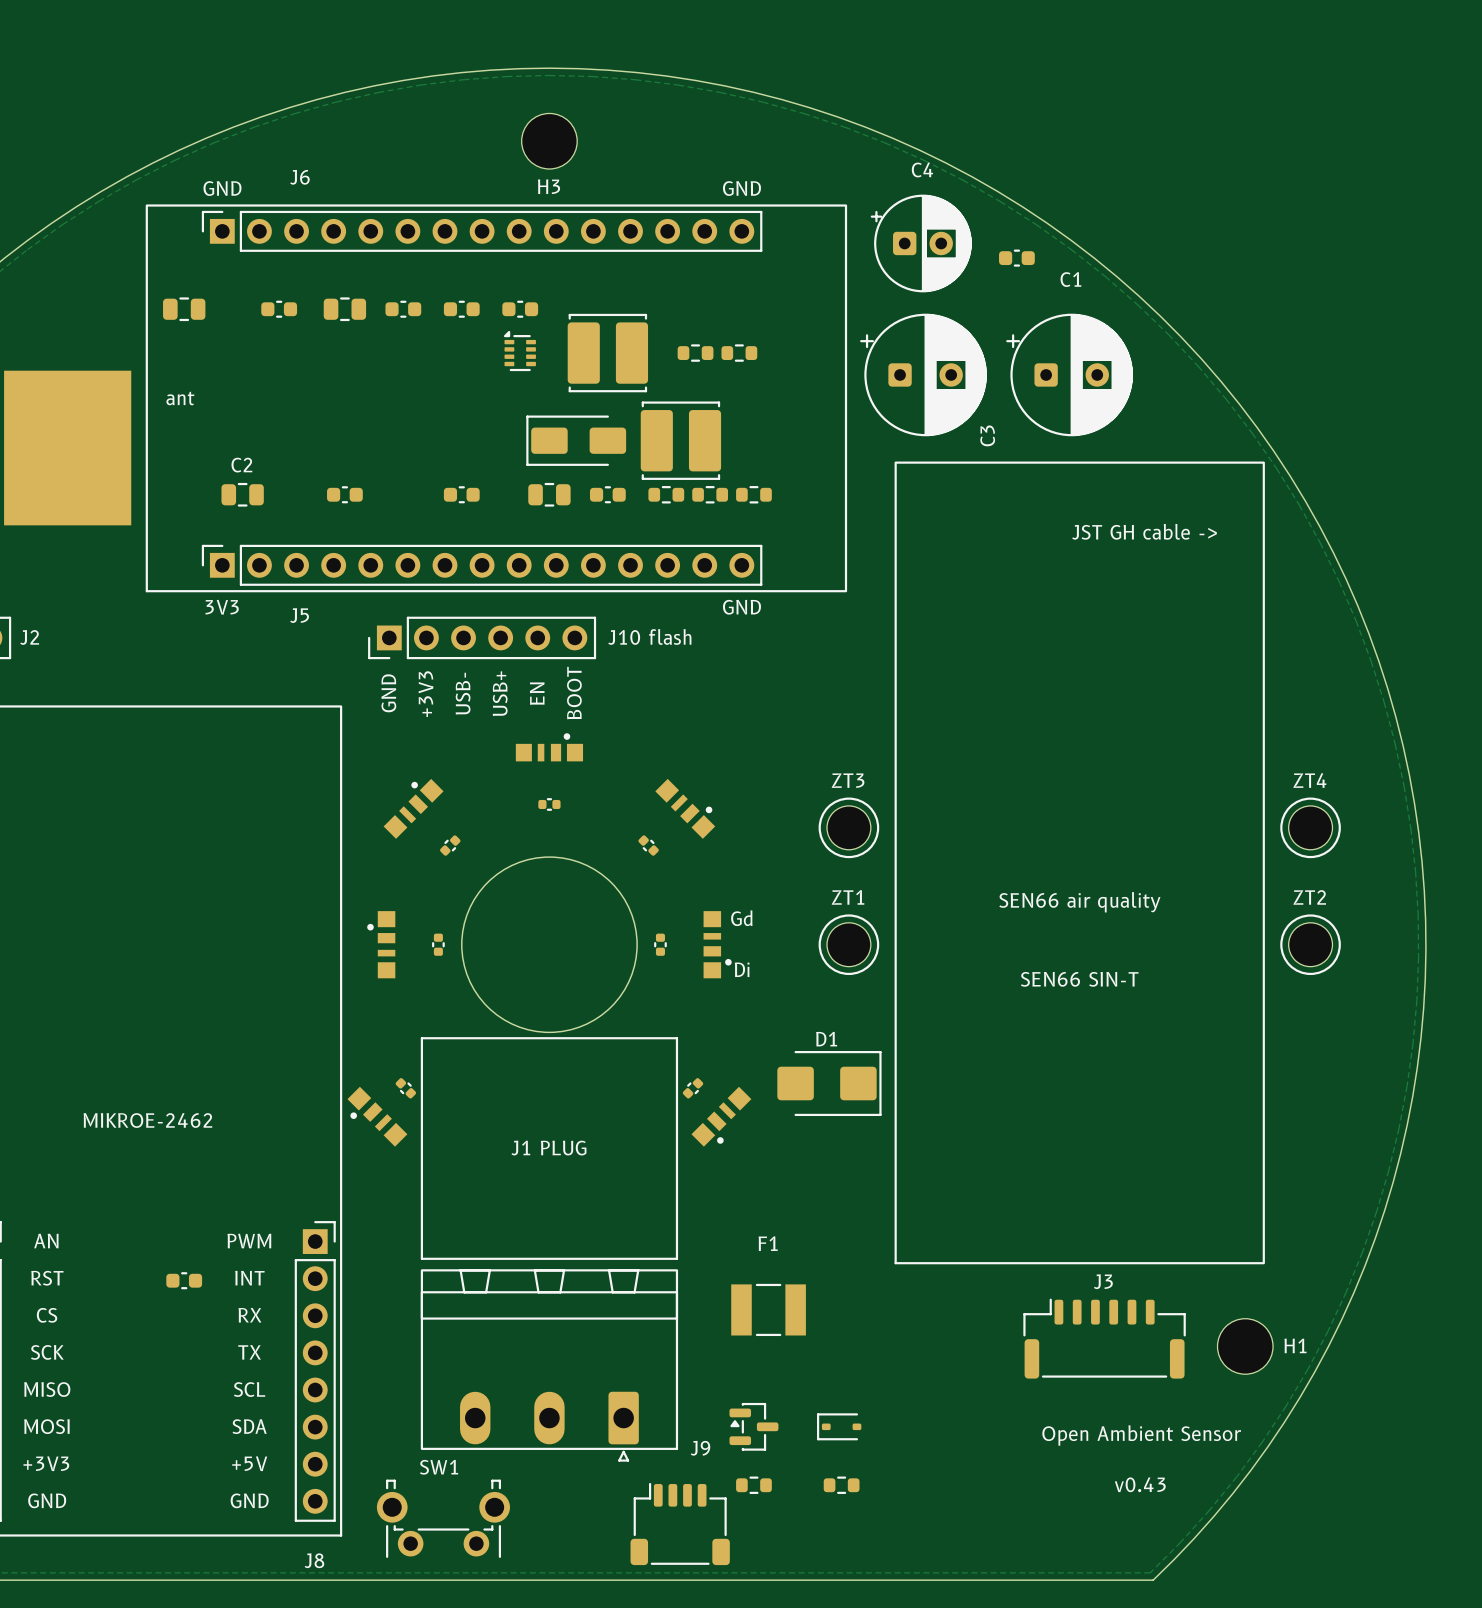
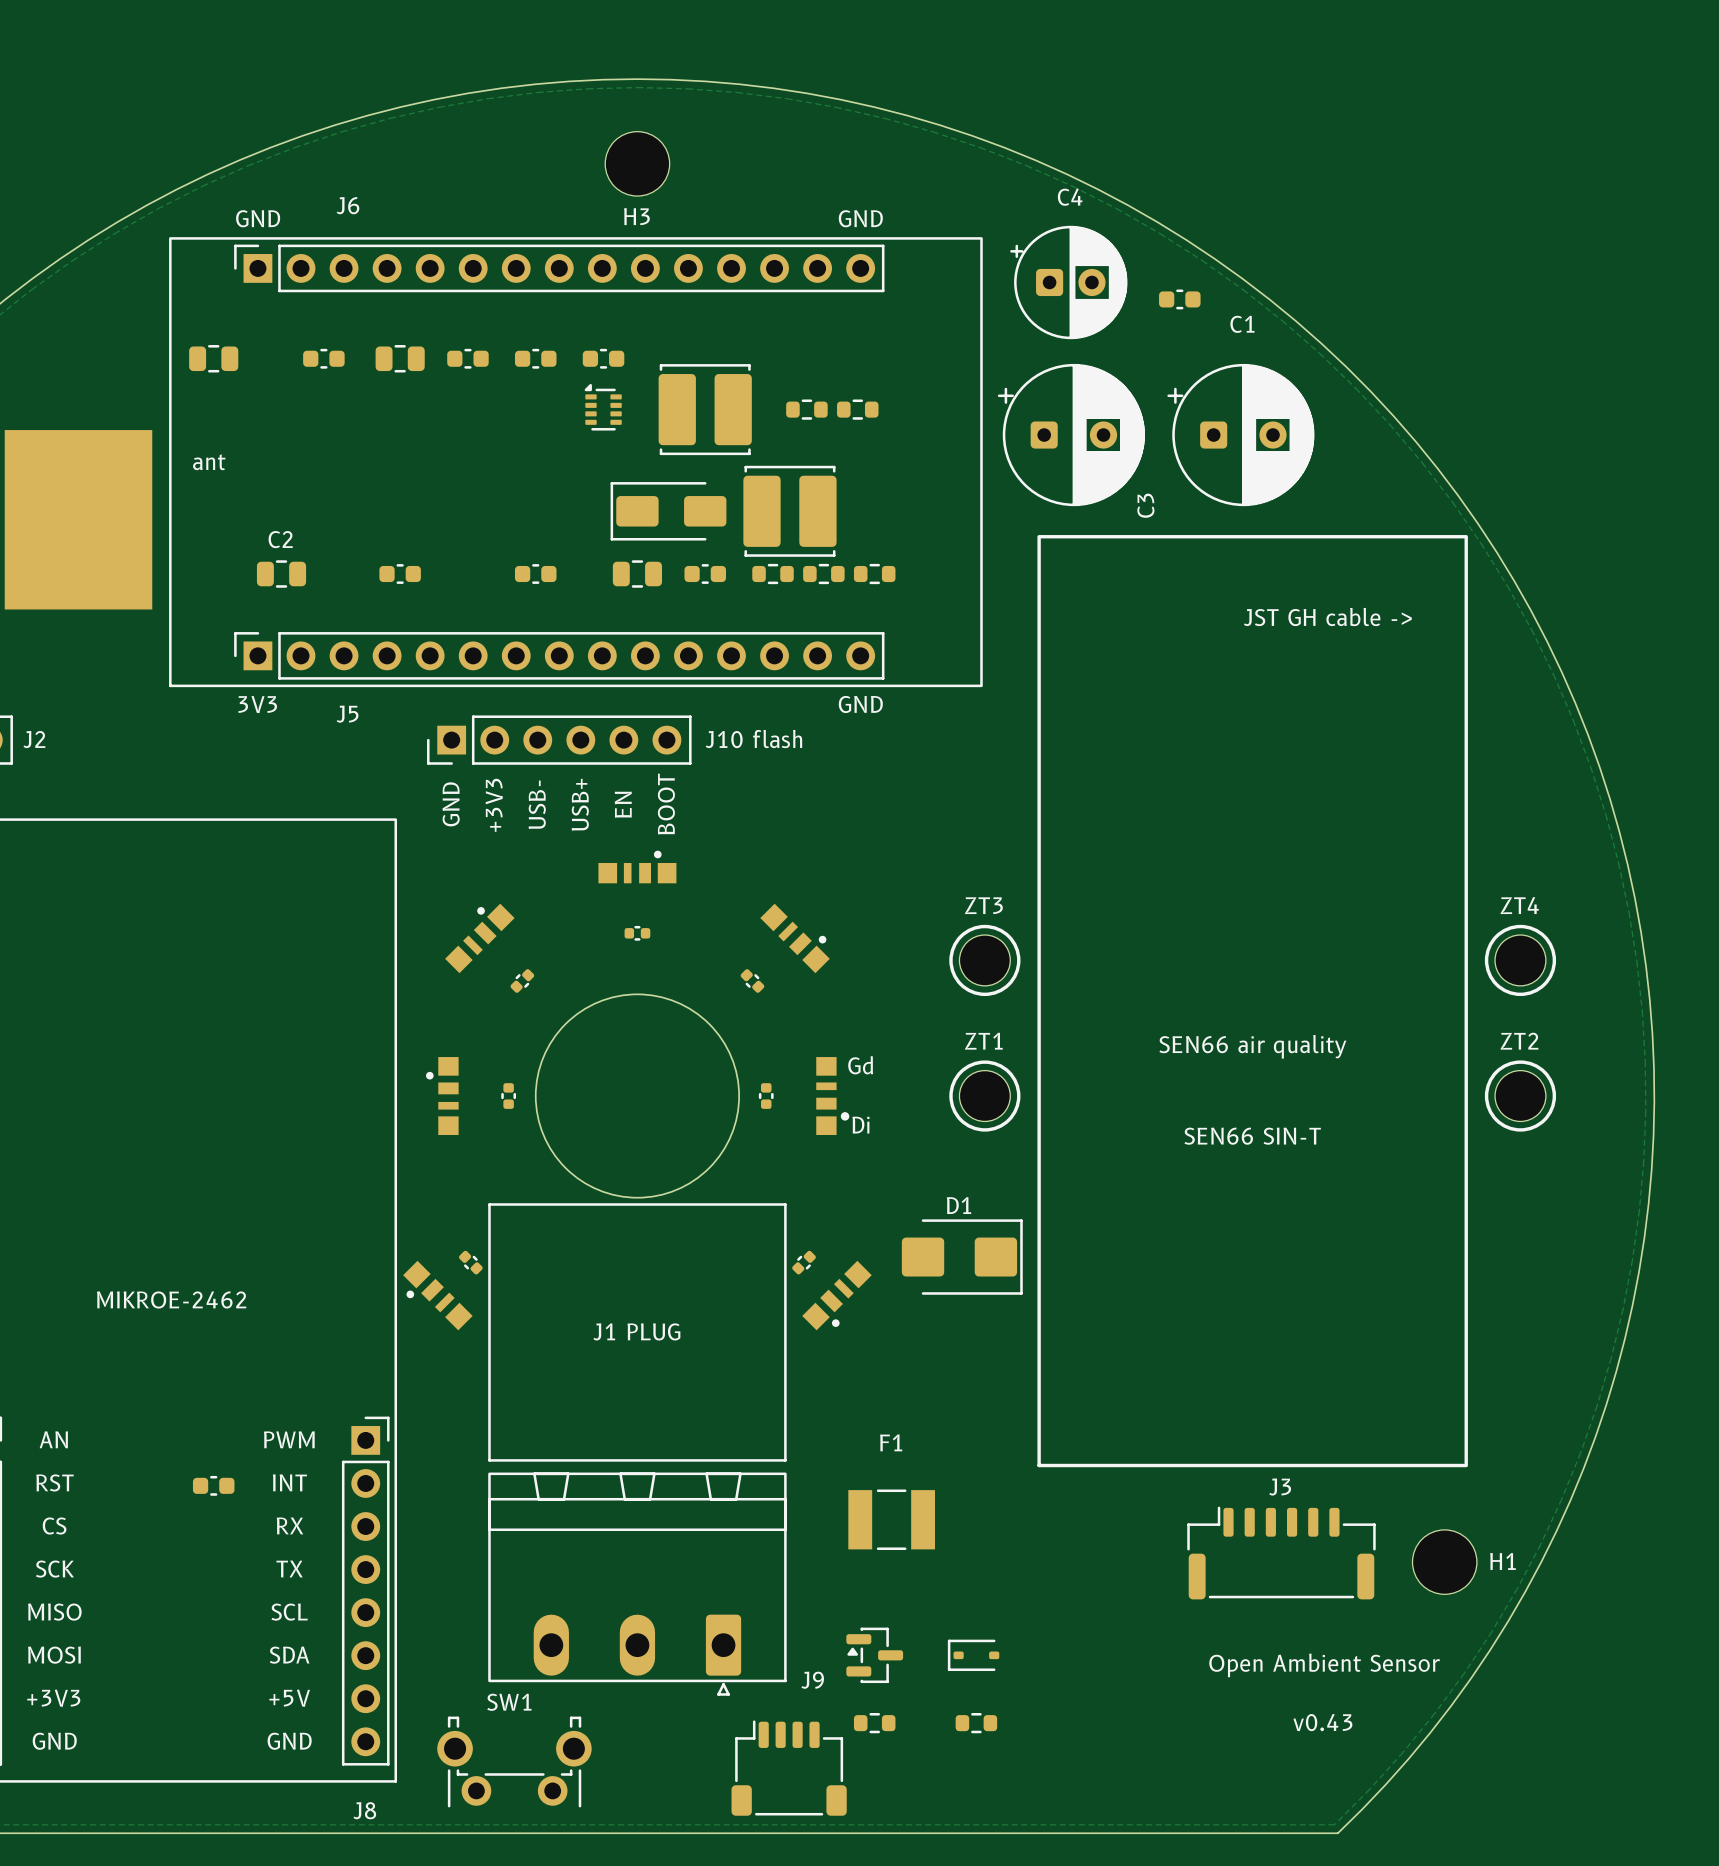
drawing shape: [894, 461, 1265, 1265] -> [1037, 535, 1468, 1468]
part footprint: [818, 797, 880, 859] -> [949, 924, 1021, 997]
part footprint: [1280, 797, 1341, 859] -> [1484, 924, 1557, 997]
part footprint: [703, 911, 732, 979] -> [816, 1057, 850, 1136]
part footprint: [818, 914, 880, 976] -> [949, 1060, 1021, 1132]
part footprint: [1280, 914, 1341, 976] -> [1484, 1060, 1557, 1132]

